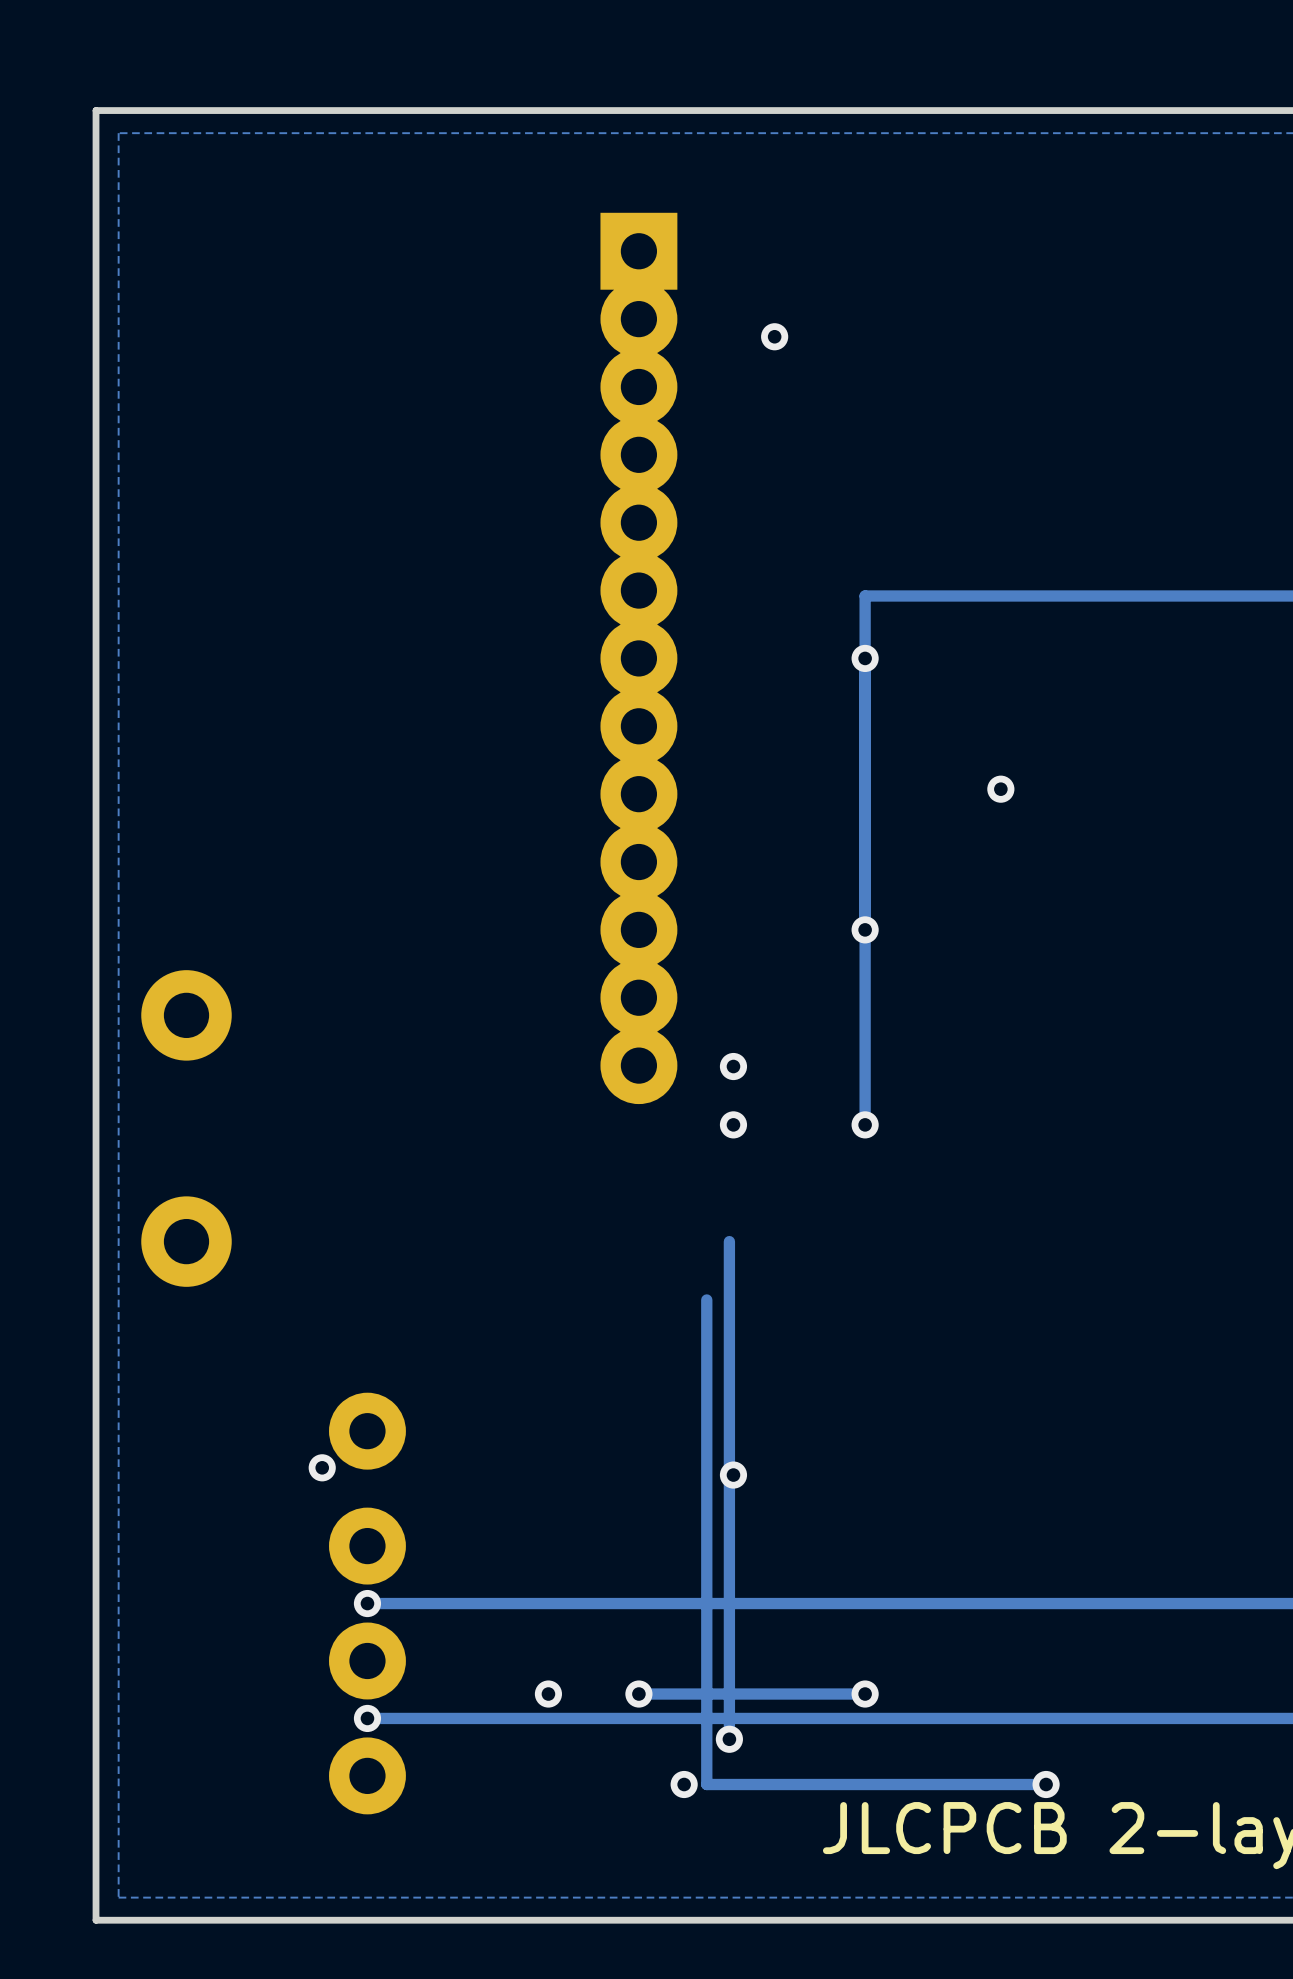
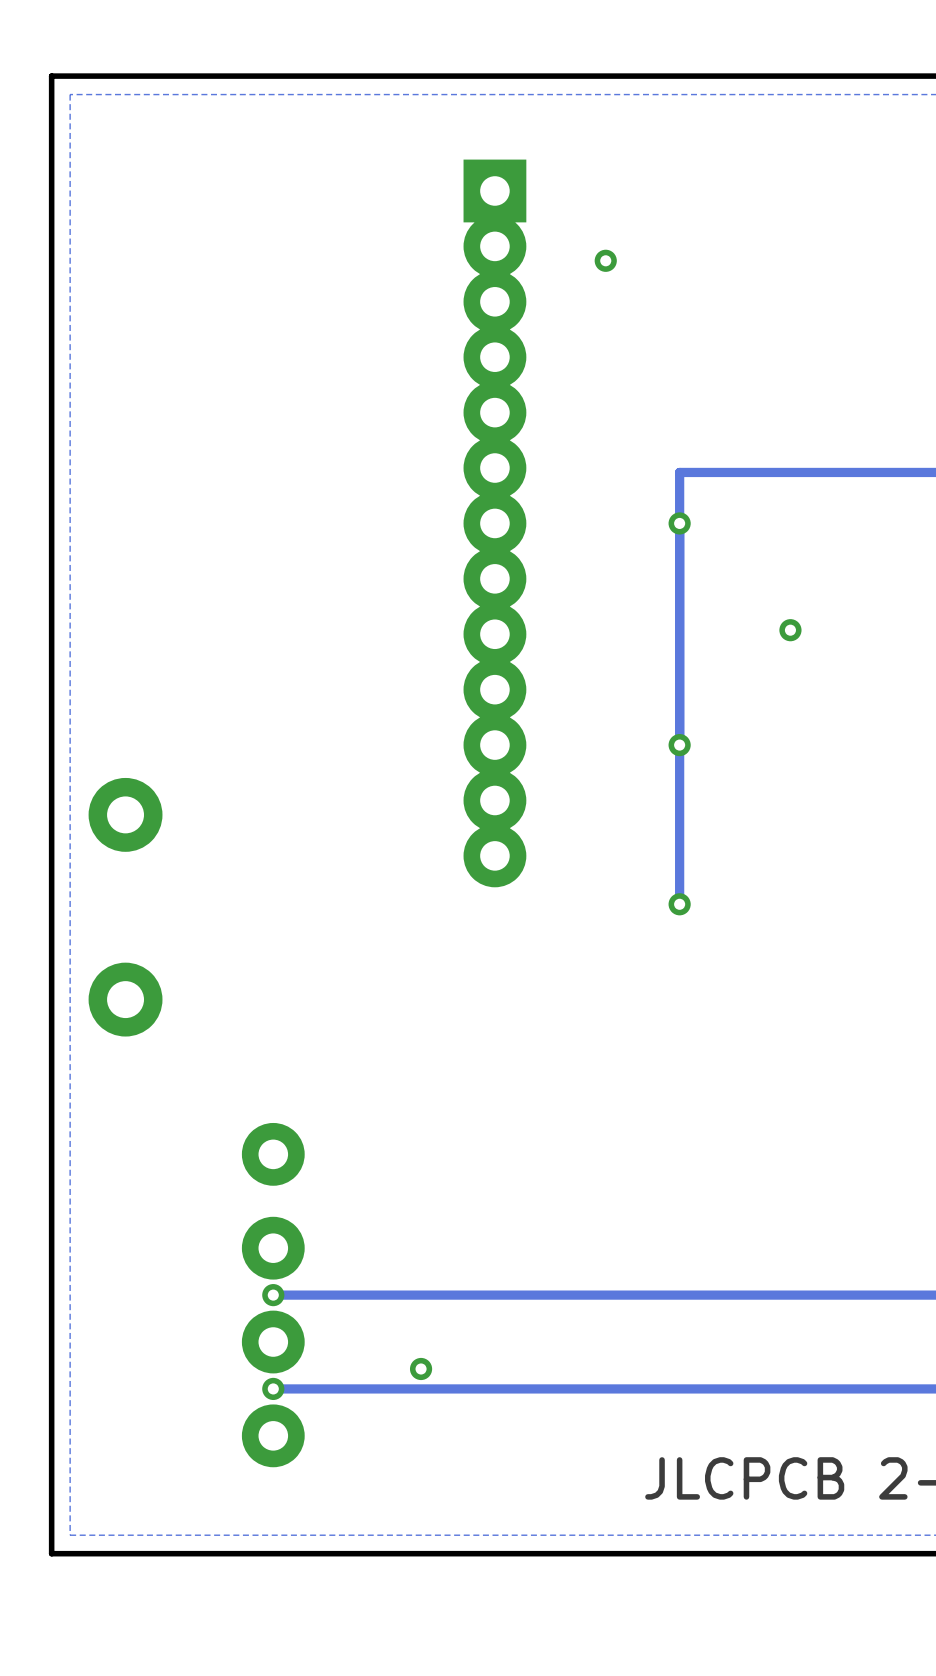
via: (733, 1066) -> none
via: (733, 1124) -> none
track: (729, 1241) (729, 1739) -> none
track: (706, 1299) (706, 1784) (1046, 1784) -> none
via: (322, 1467) -> none
via: (733, 1475) -> none
via: (638, 1694) -> none
track: (865, 1694) (638, 1694) -> none
via: (865, 1694) -> none
via: (729, 1739) -> none
via: (684, 1784) -> none
via: (1046, 1784) -> none

